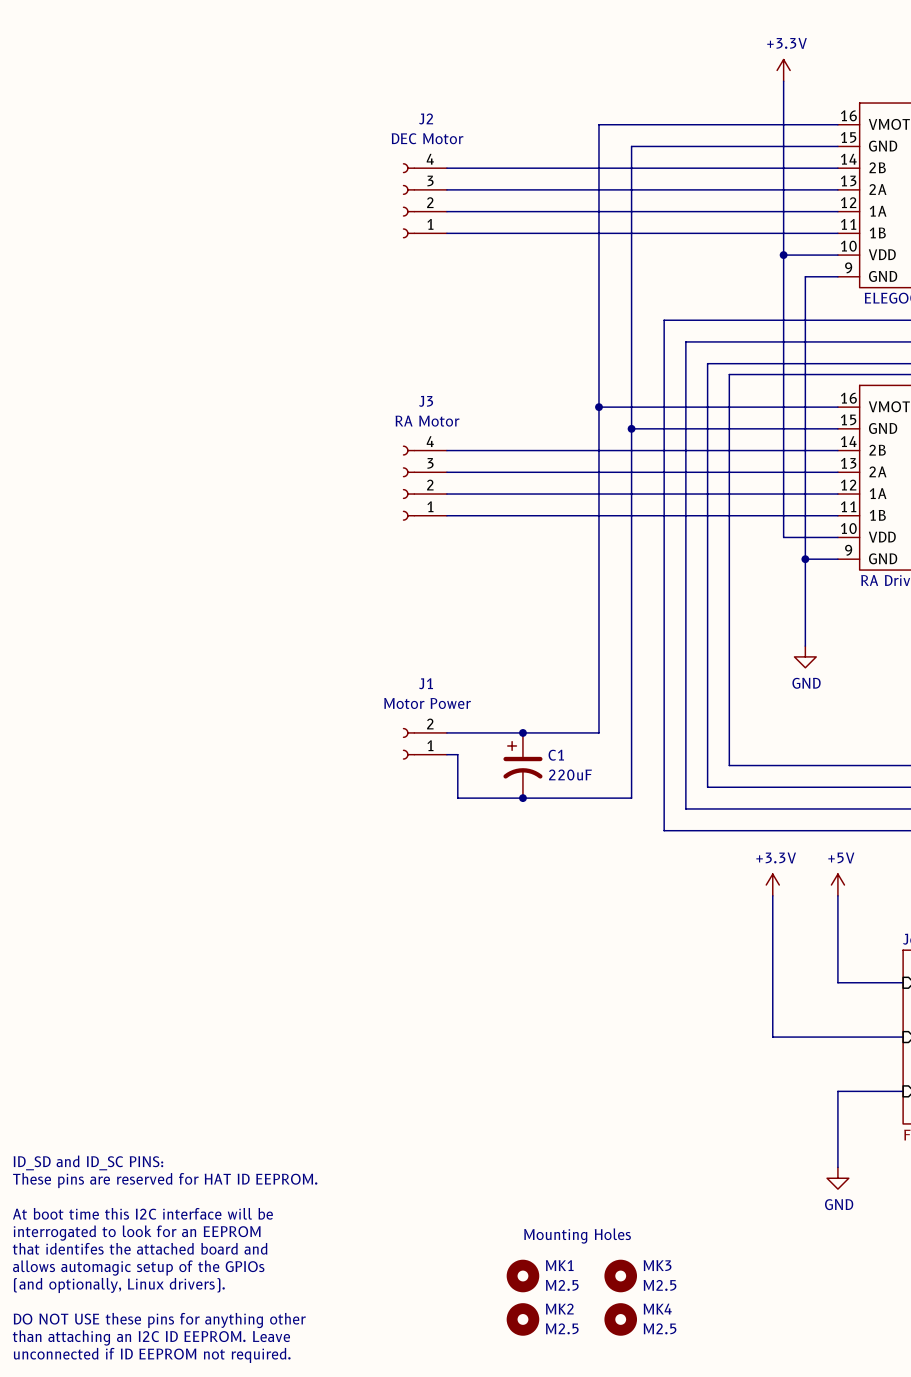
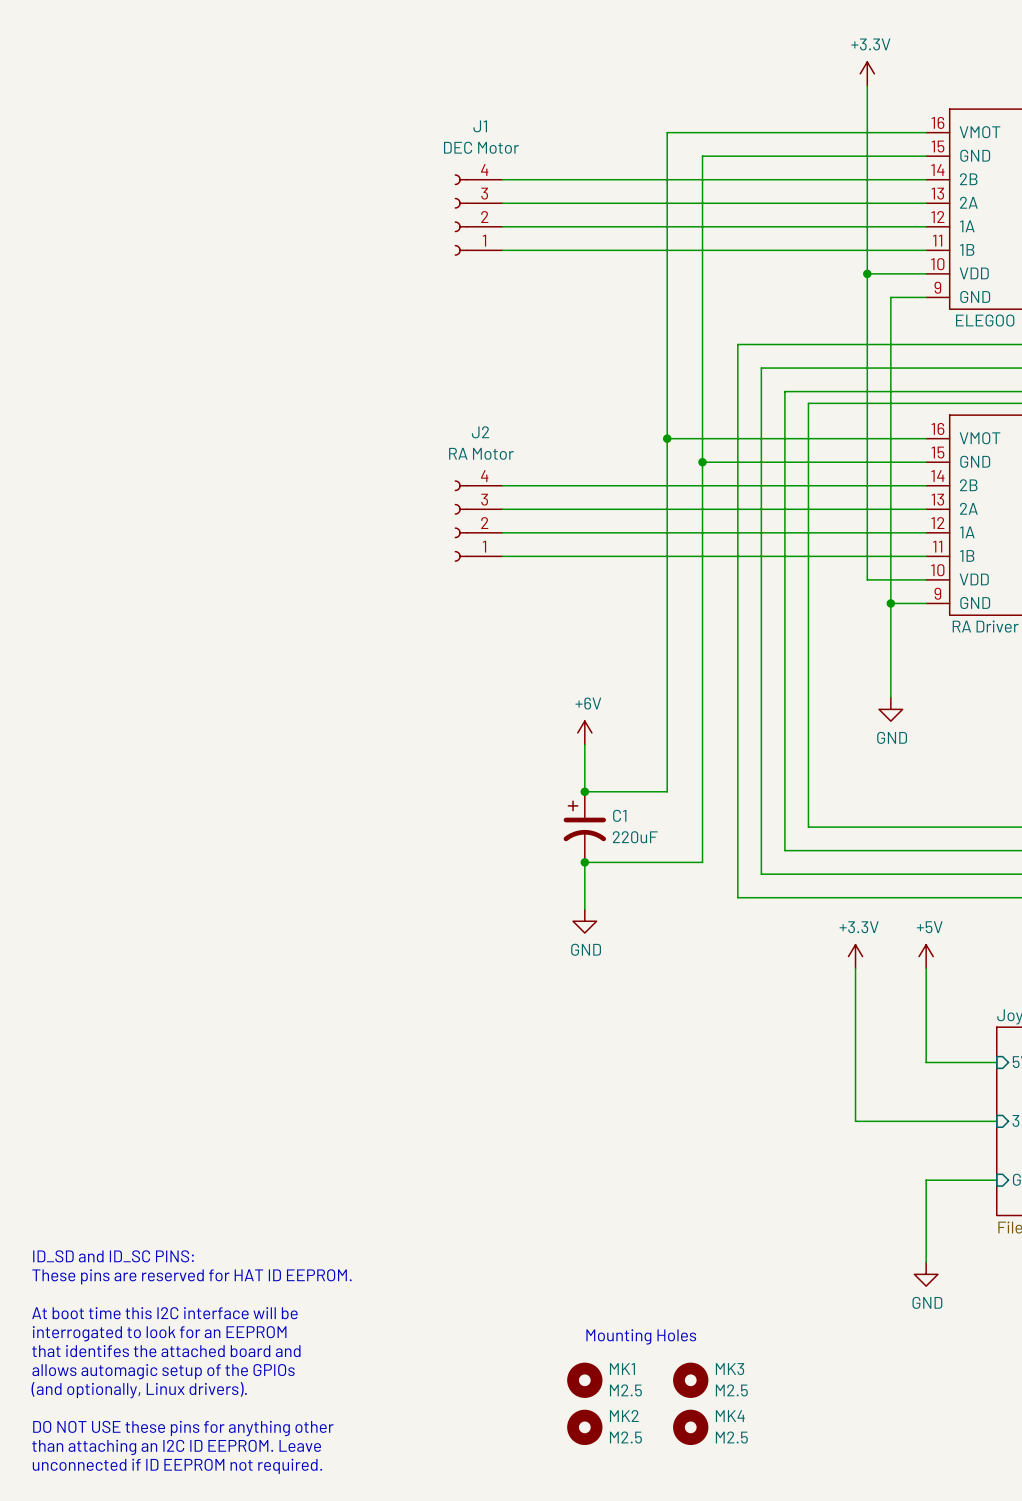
J2 name: J2 (426, 118) -> J1 (480, 126)
J3 name: J3 (426, 401) -> J2 (480, 432)
power symbol: none -> +6V (584, 732)
wire: (446, 732) (522, 732) -> (584, 744) (584, 791)
J1: Motor Power (424, 743) -> none
wire: (446, 754) (457, 754) (457, 798) (522, 798) -> (584, 909) (584, 862)
power symbol: none -> GND (584, 921)

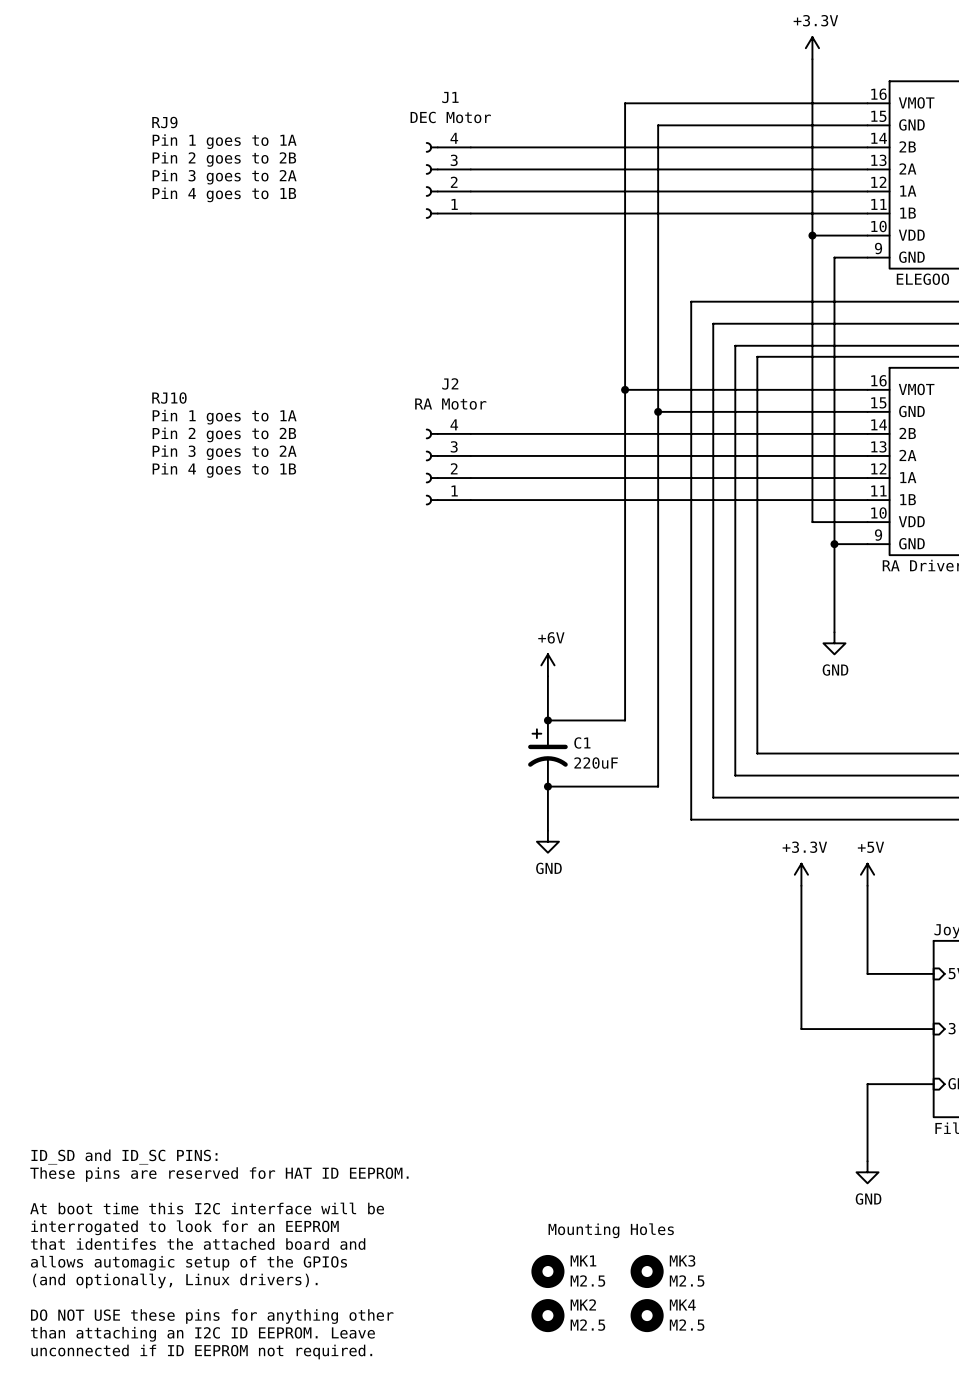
text: none -> RJ9 (164, 122)
text: none -> Pin 1 goes to 1A (224, 141)
text: none -> Pin 2 goes to 2B (224, 159)
text: none -> Pin 3 goes to 2A (224, 177)
text: none -> Pin 4 goes to 1B (224, 194)
text: none -> RJ10 (169, 398)
text: none -> Pin 1 goes to 1A (224, 417)
text: none -> Pin 2 goes to 2B (224, 434)
text: none -> Pin 3 goes to 2A (224, 452)
text: none -> Pin 4 goes to 1B (224, 470)

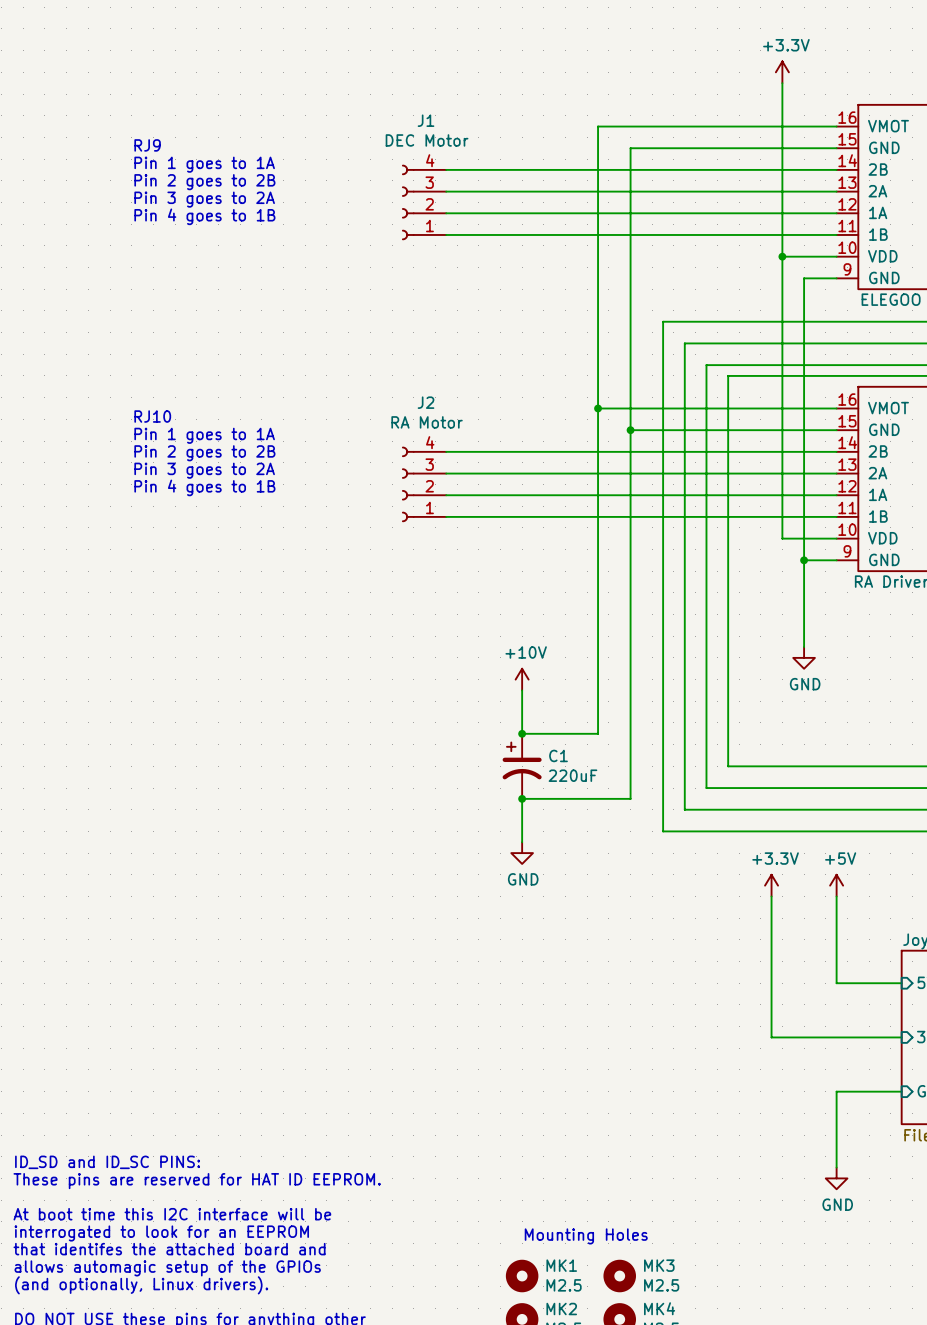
power symbol: +6V (547, 665) -> +10V (522, 679)

